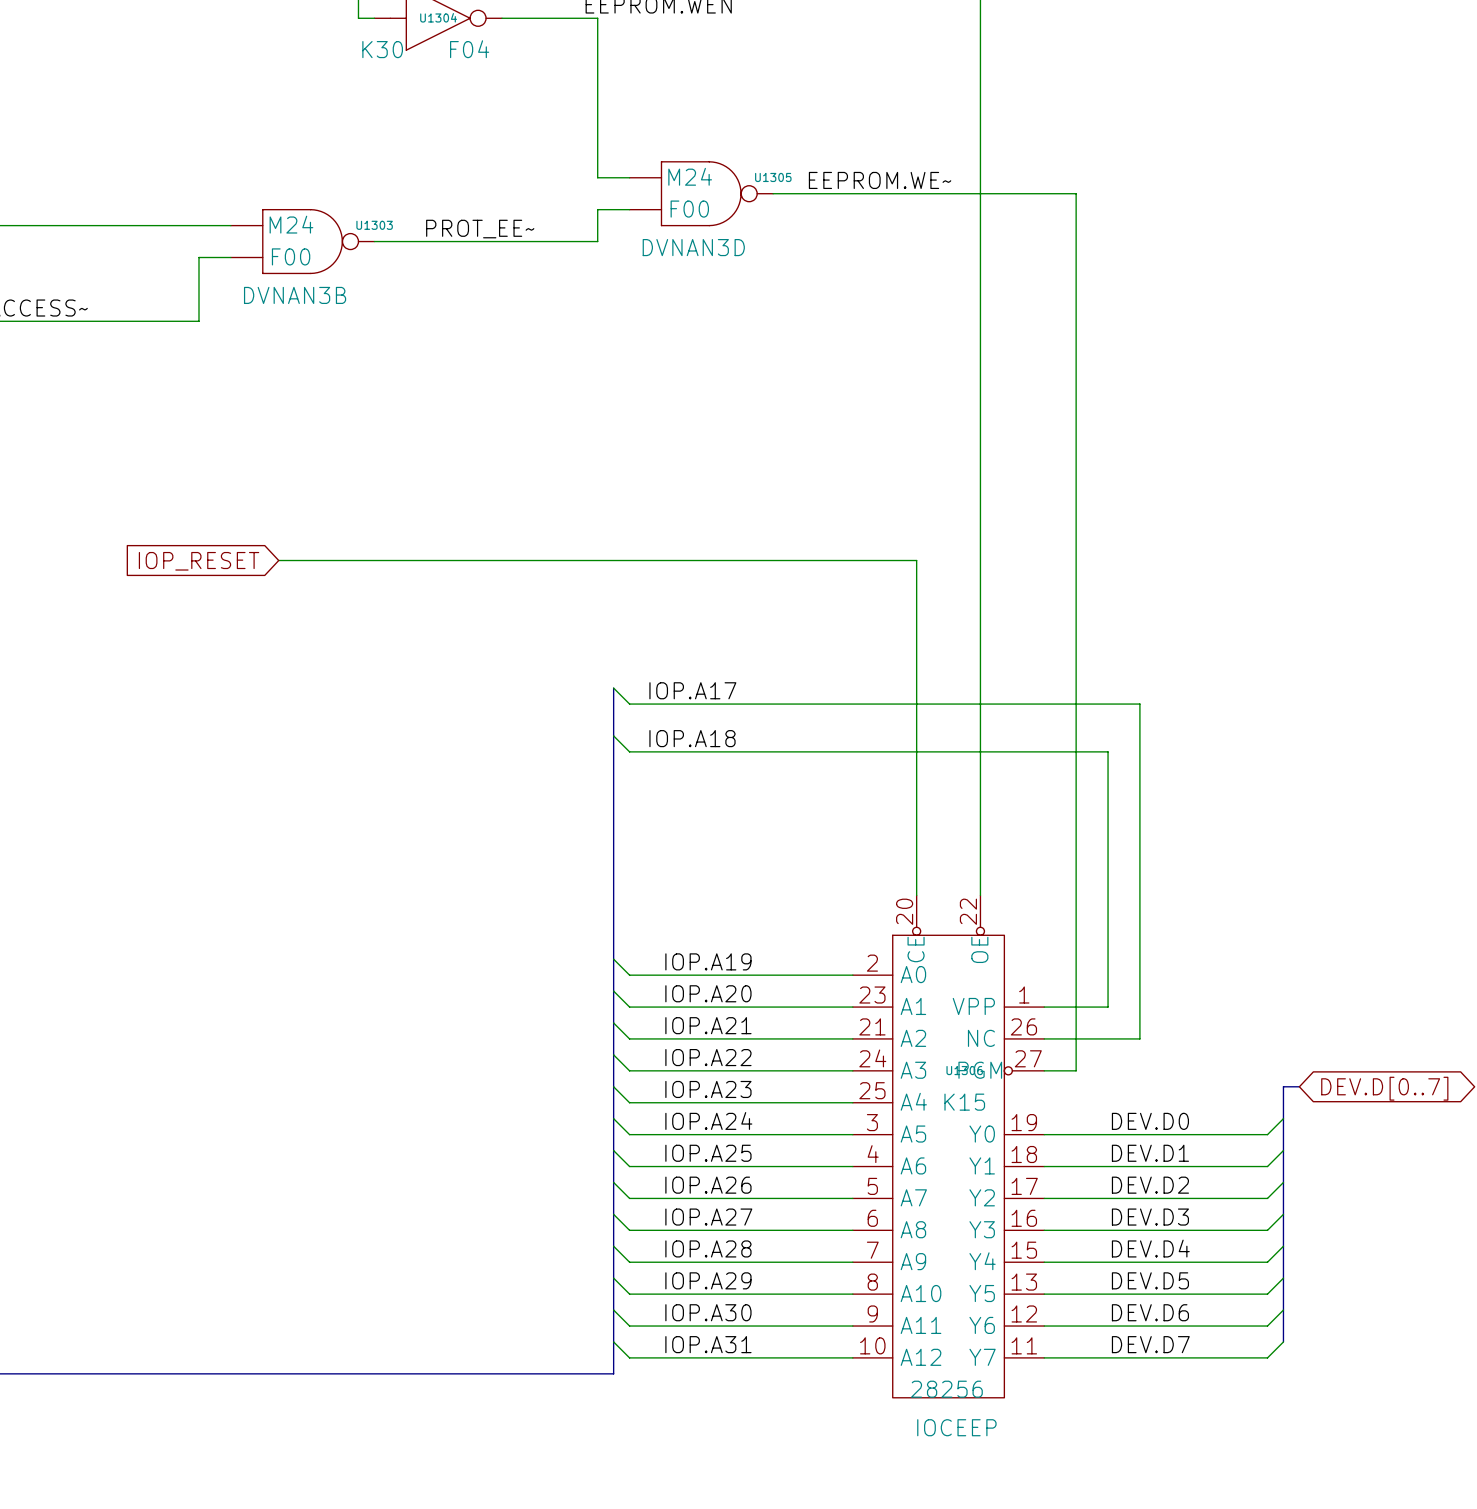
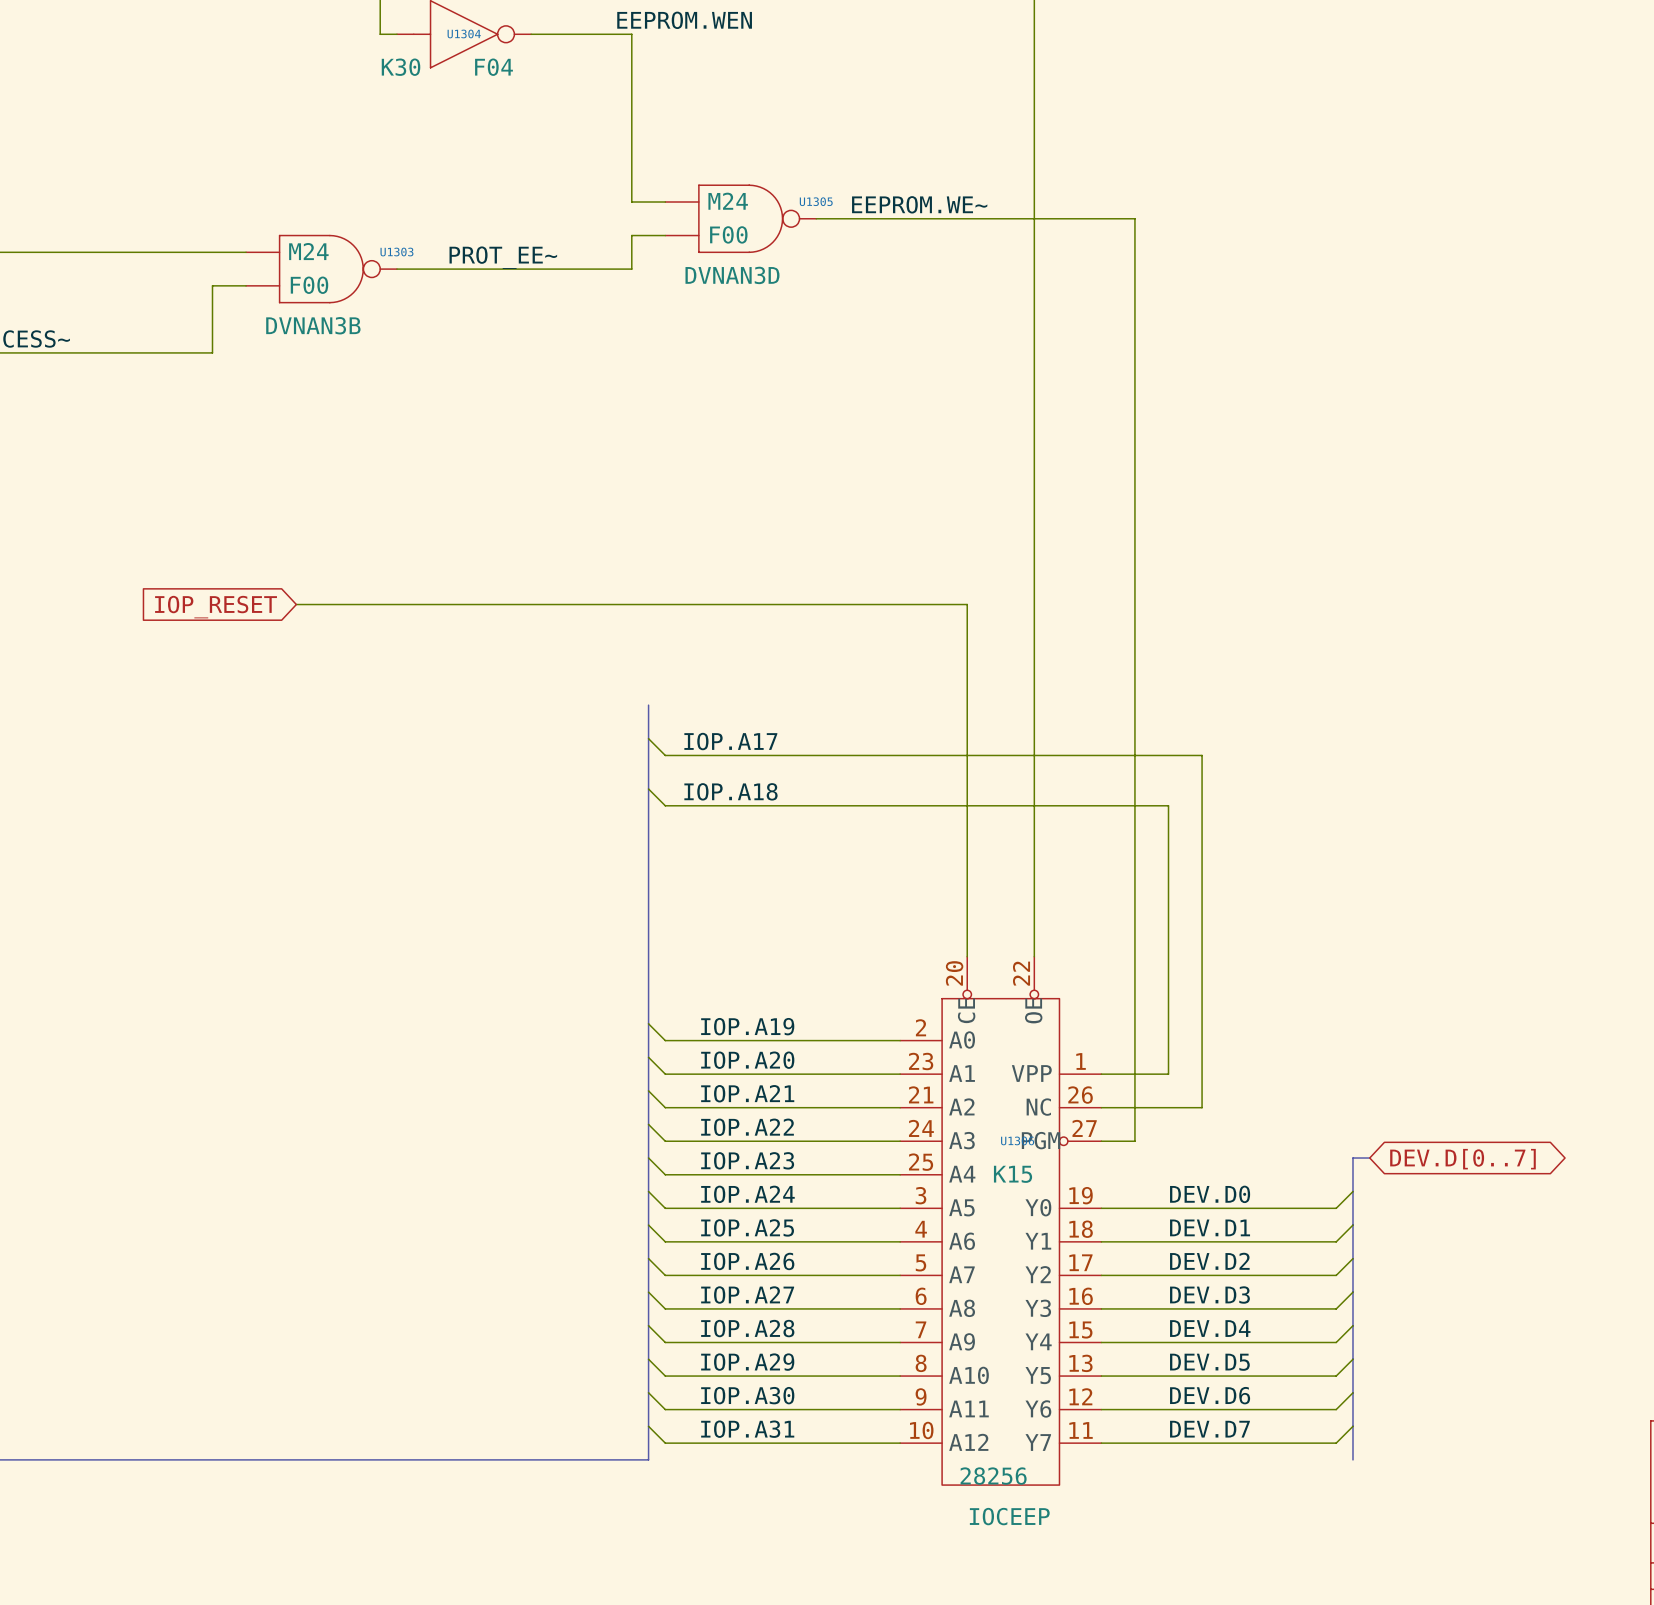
bus: none -> (648, 705) (648, 738)
bus: none -> (1352, 1426) (1352, 1459)

